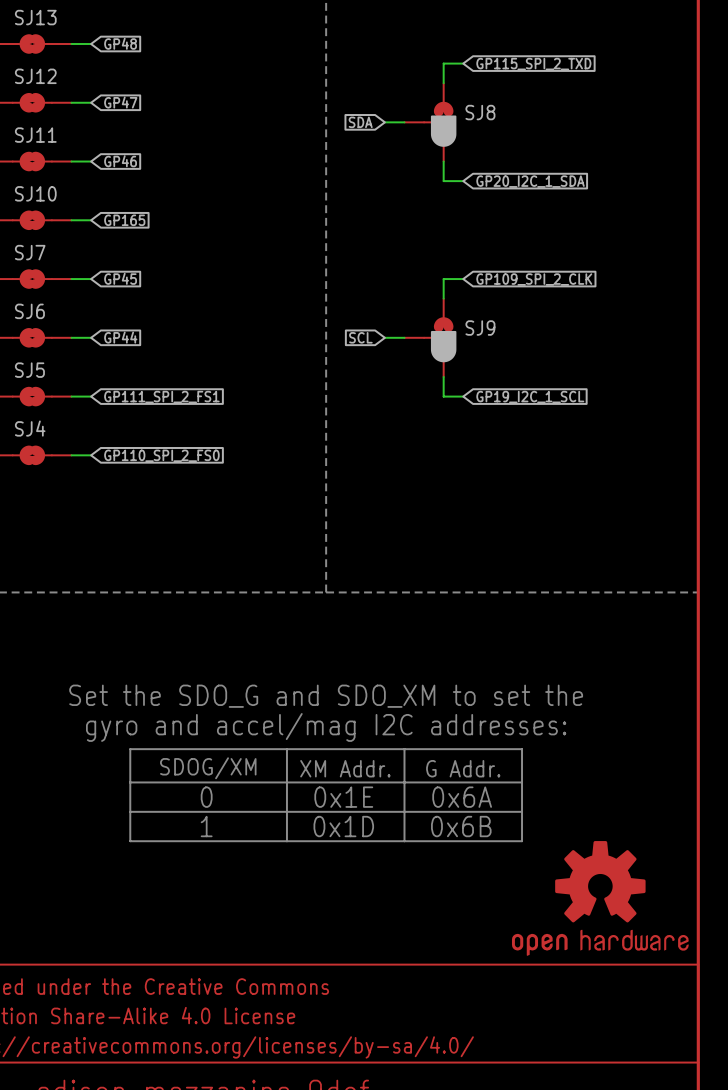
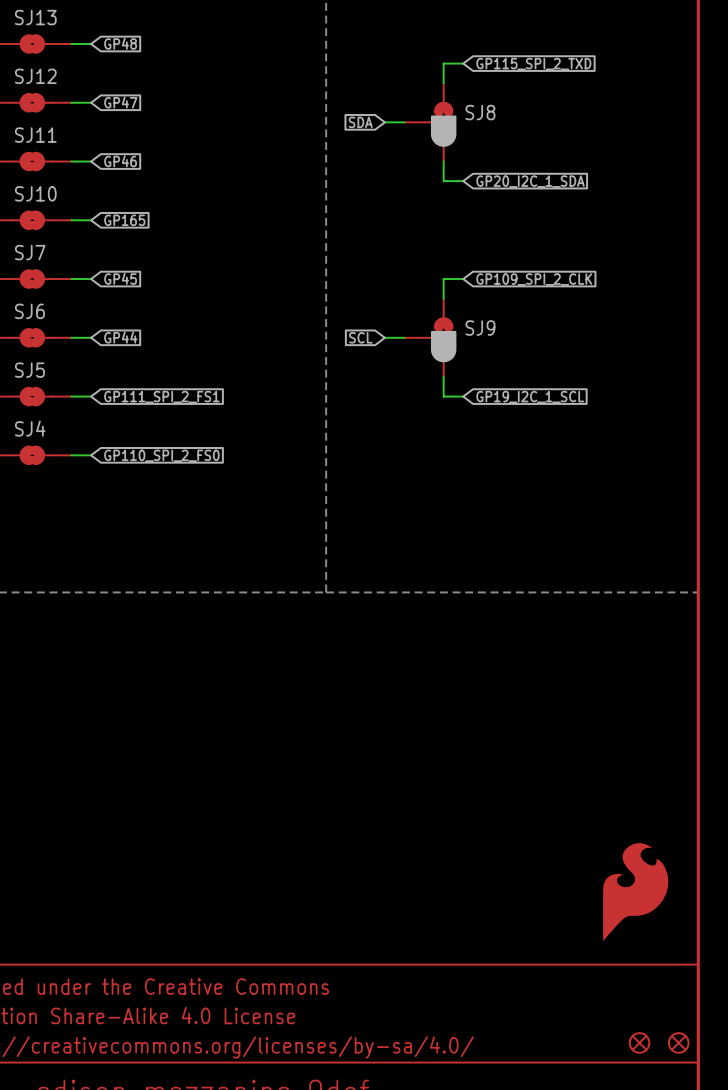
text: Set the SDO_G and SDO_XM to set the (326, 696) -> none
text: gyro and accel/mag I2C addresses: (326, 727) -> none
line: (130, 749) (130, 841) (522, 841) (522, 749) (130, 749) -> none
line: (286, 749) (286, 841) -> none
line: (404, 749) (404, 841) -> none
text: SDOG/XM (208, 768) -> none
text: XM Addr. (345, 768) -> none
text: G Addr. (463, 768) -> none
line: (130, 782) (522, 782) -> none
text: 0 (206, 797) -> none
text: 0x1E (343, 797) -> none
text: 0x6A (462, 797) -> none
line: (130, 811) (522, 811) -> none
text: 1 (206, 826) -> none
text: 0x1D (343, 826) -> none
text: 0x6B (461, 826) -> none
part: none -> (635, 892)
part: (600, 898) -> none
part: none -> (639, 1042)
part: none -> (678, 1042)

